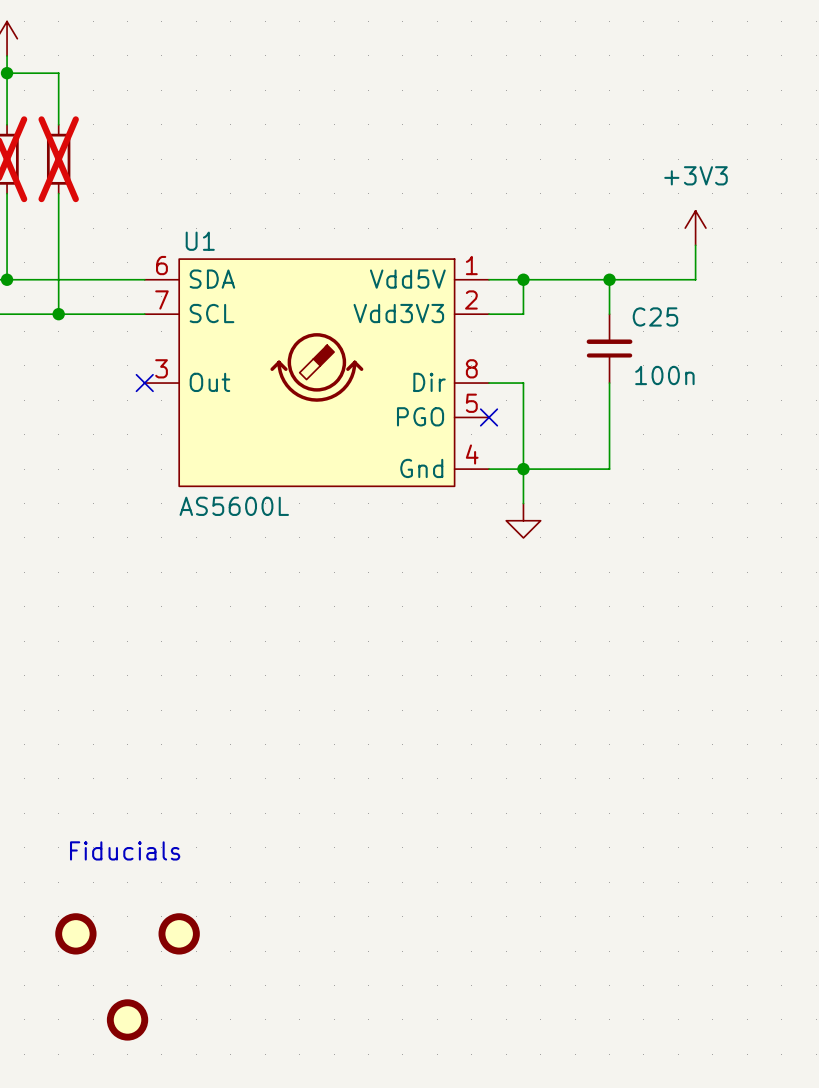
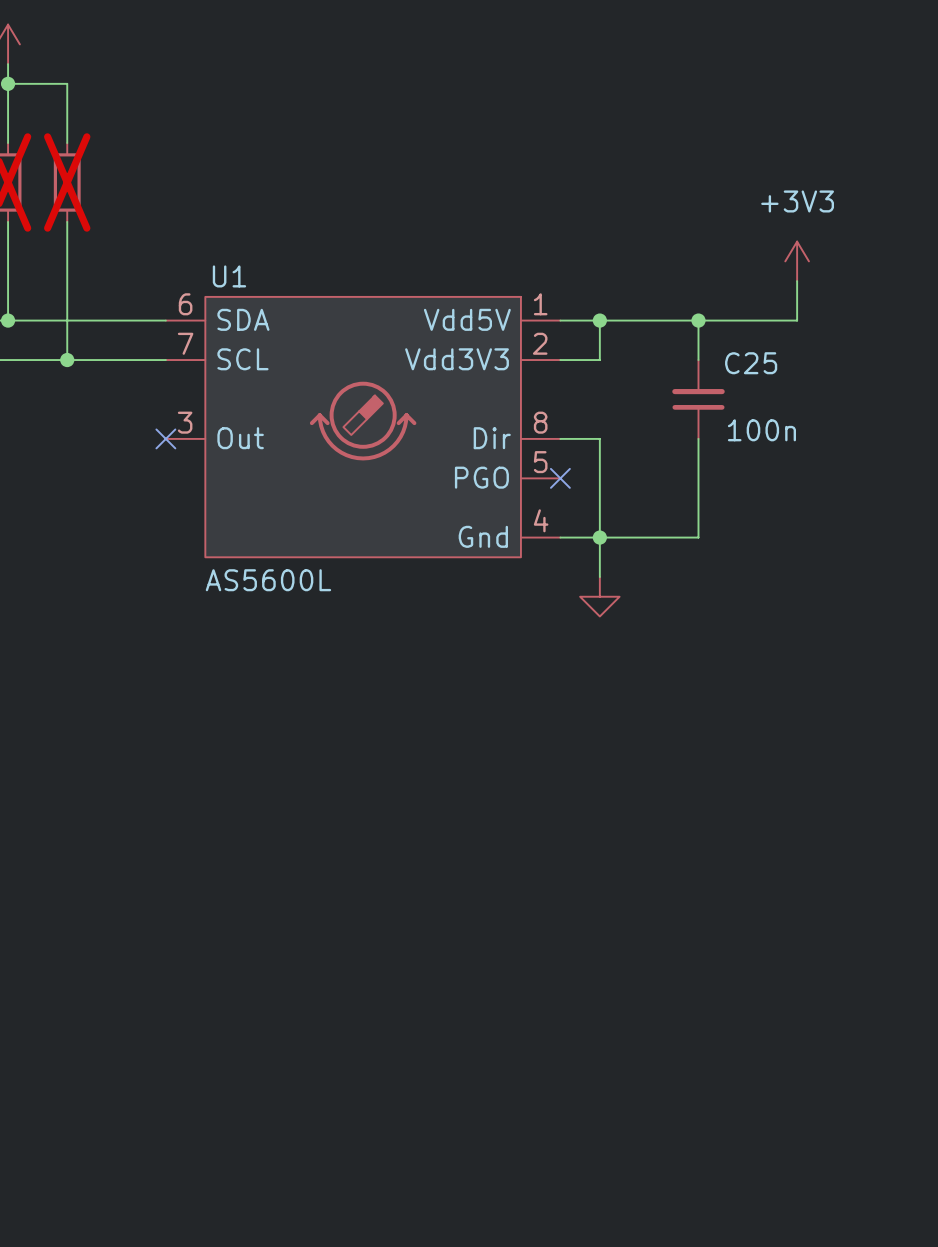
text: Fiducials (125, 850) -> none
part: (75, 933) -> none
part: (179, 933) -> none
part: (127, 1019) -> none

